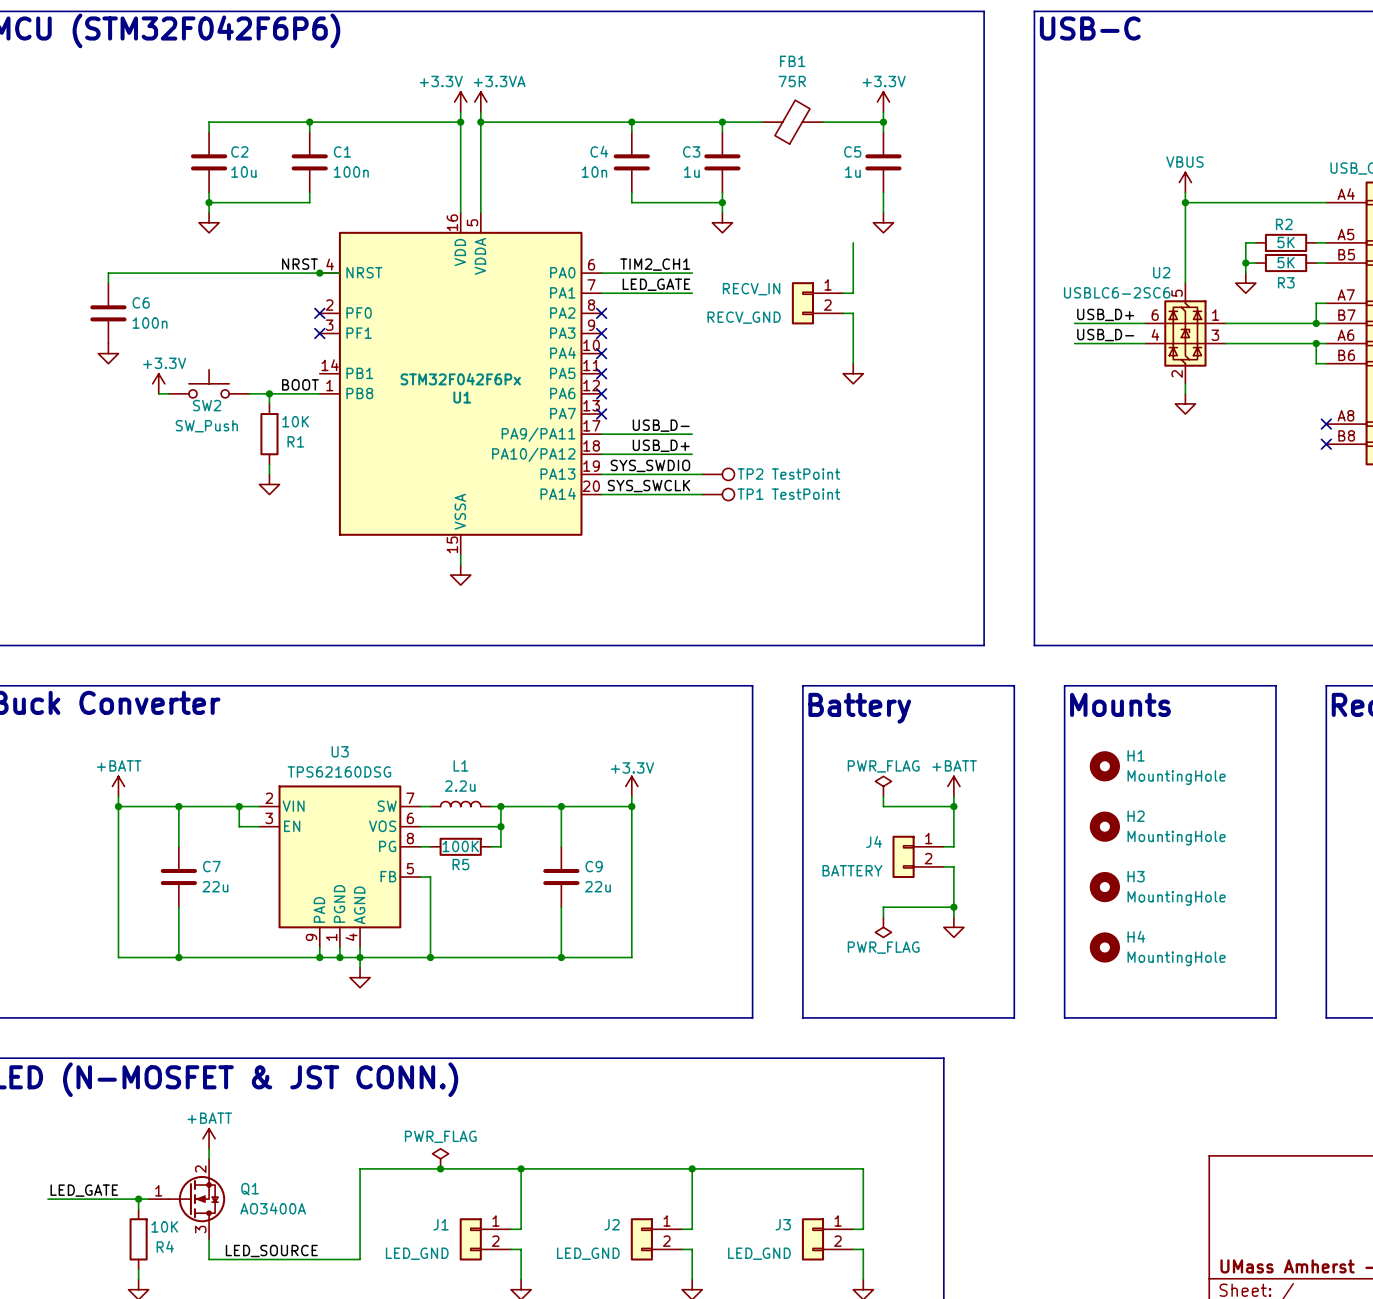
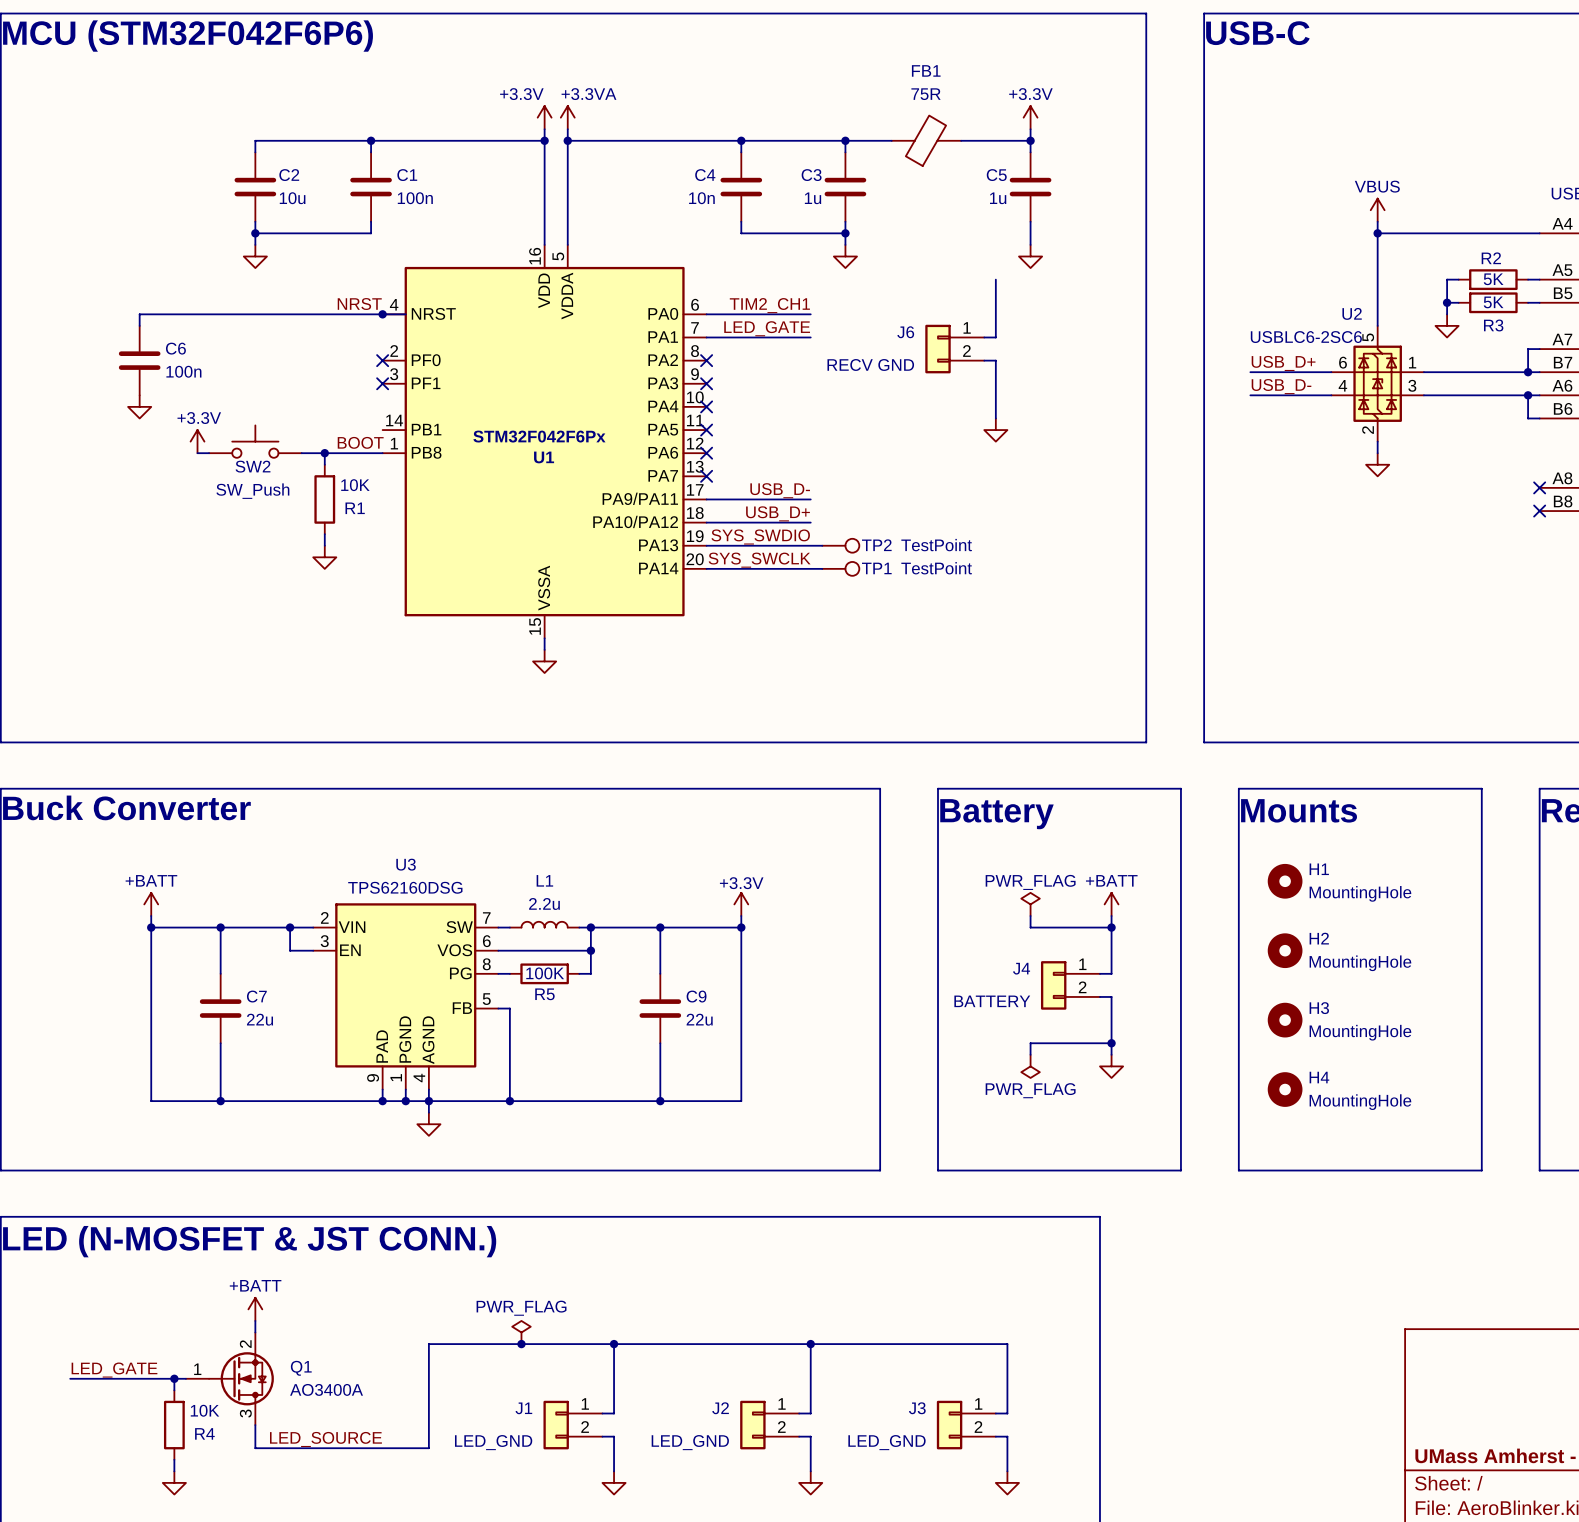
RECV_IN name: RECV_IN (751, 289) -> J6 (905, 332)
RECV_IN value: RECV_GND (744, 317) -> RECV GND (870, 364)

